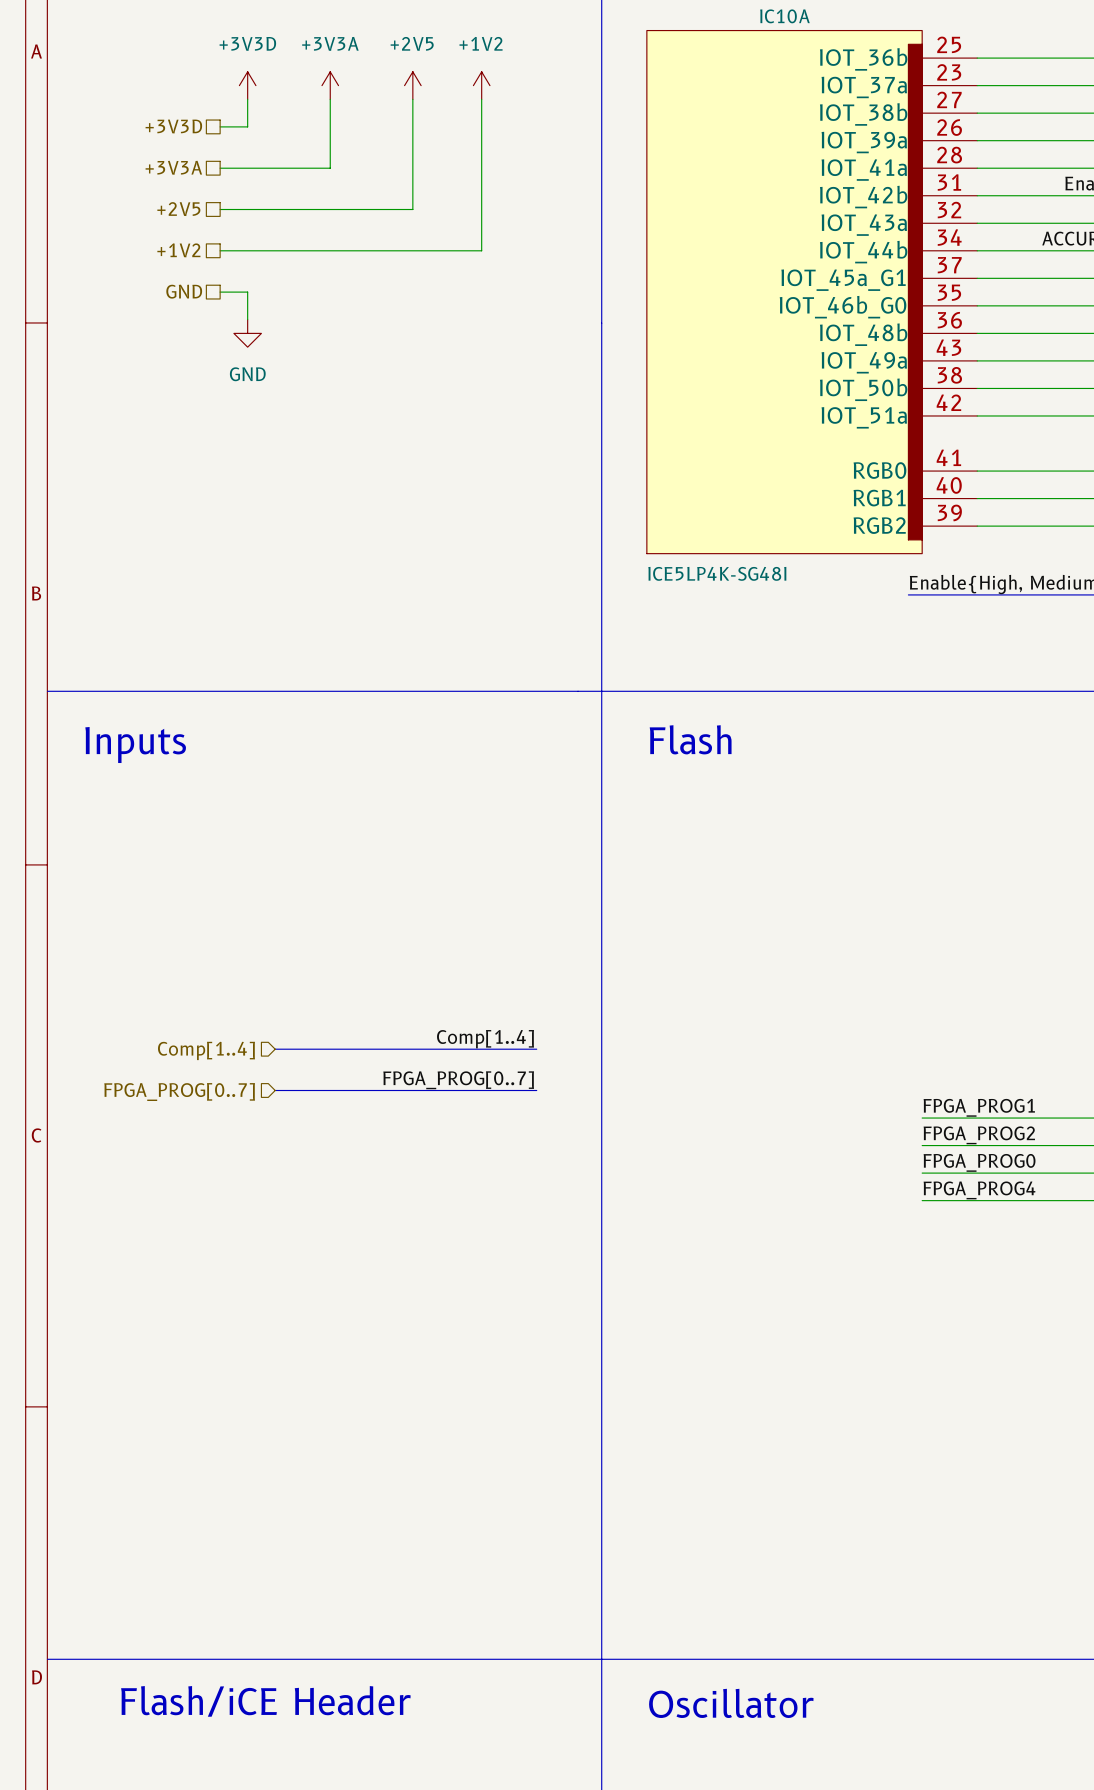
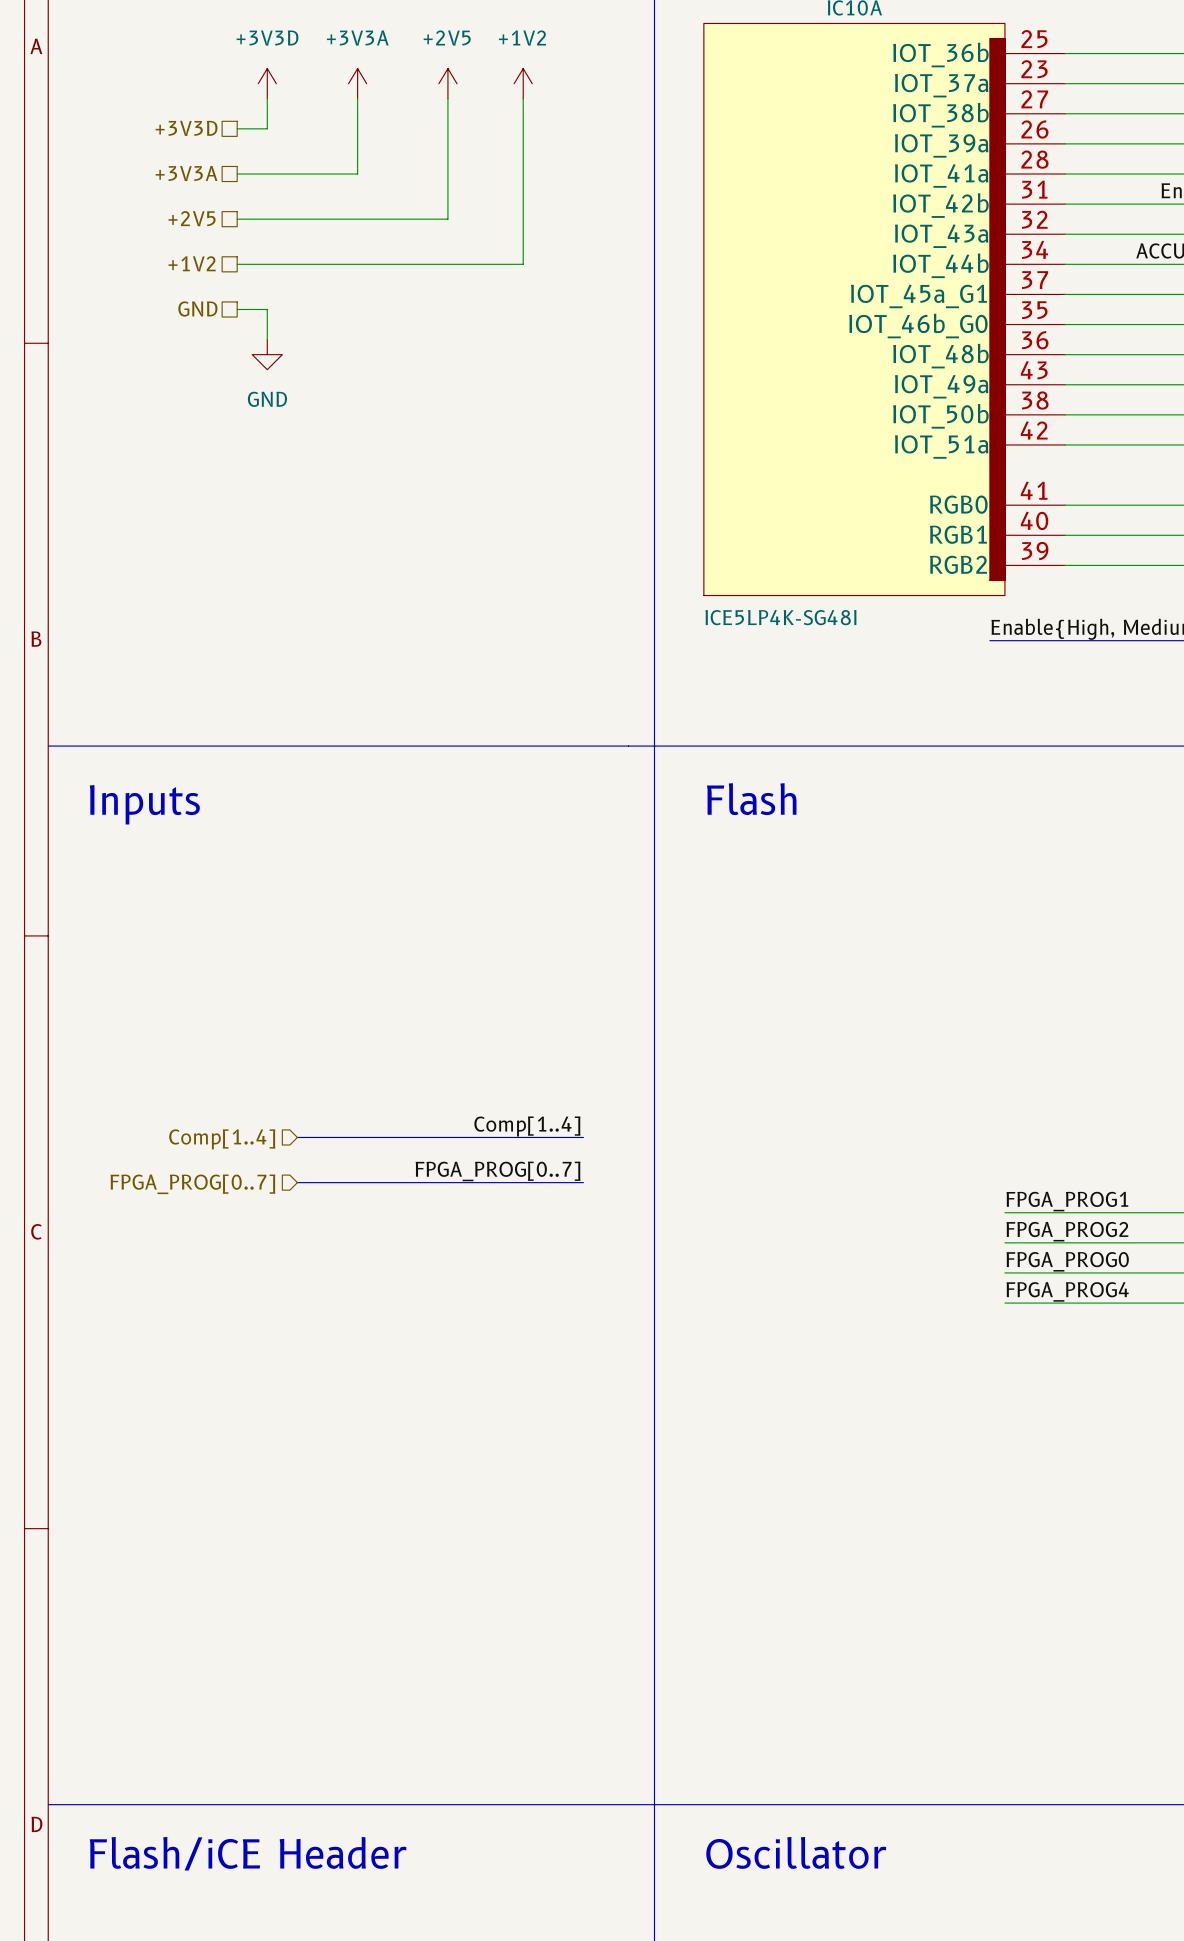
text position: Flash/iCE Header (265, 1701) -> Flash/iCE Header (248, 1853)

